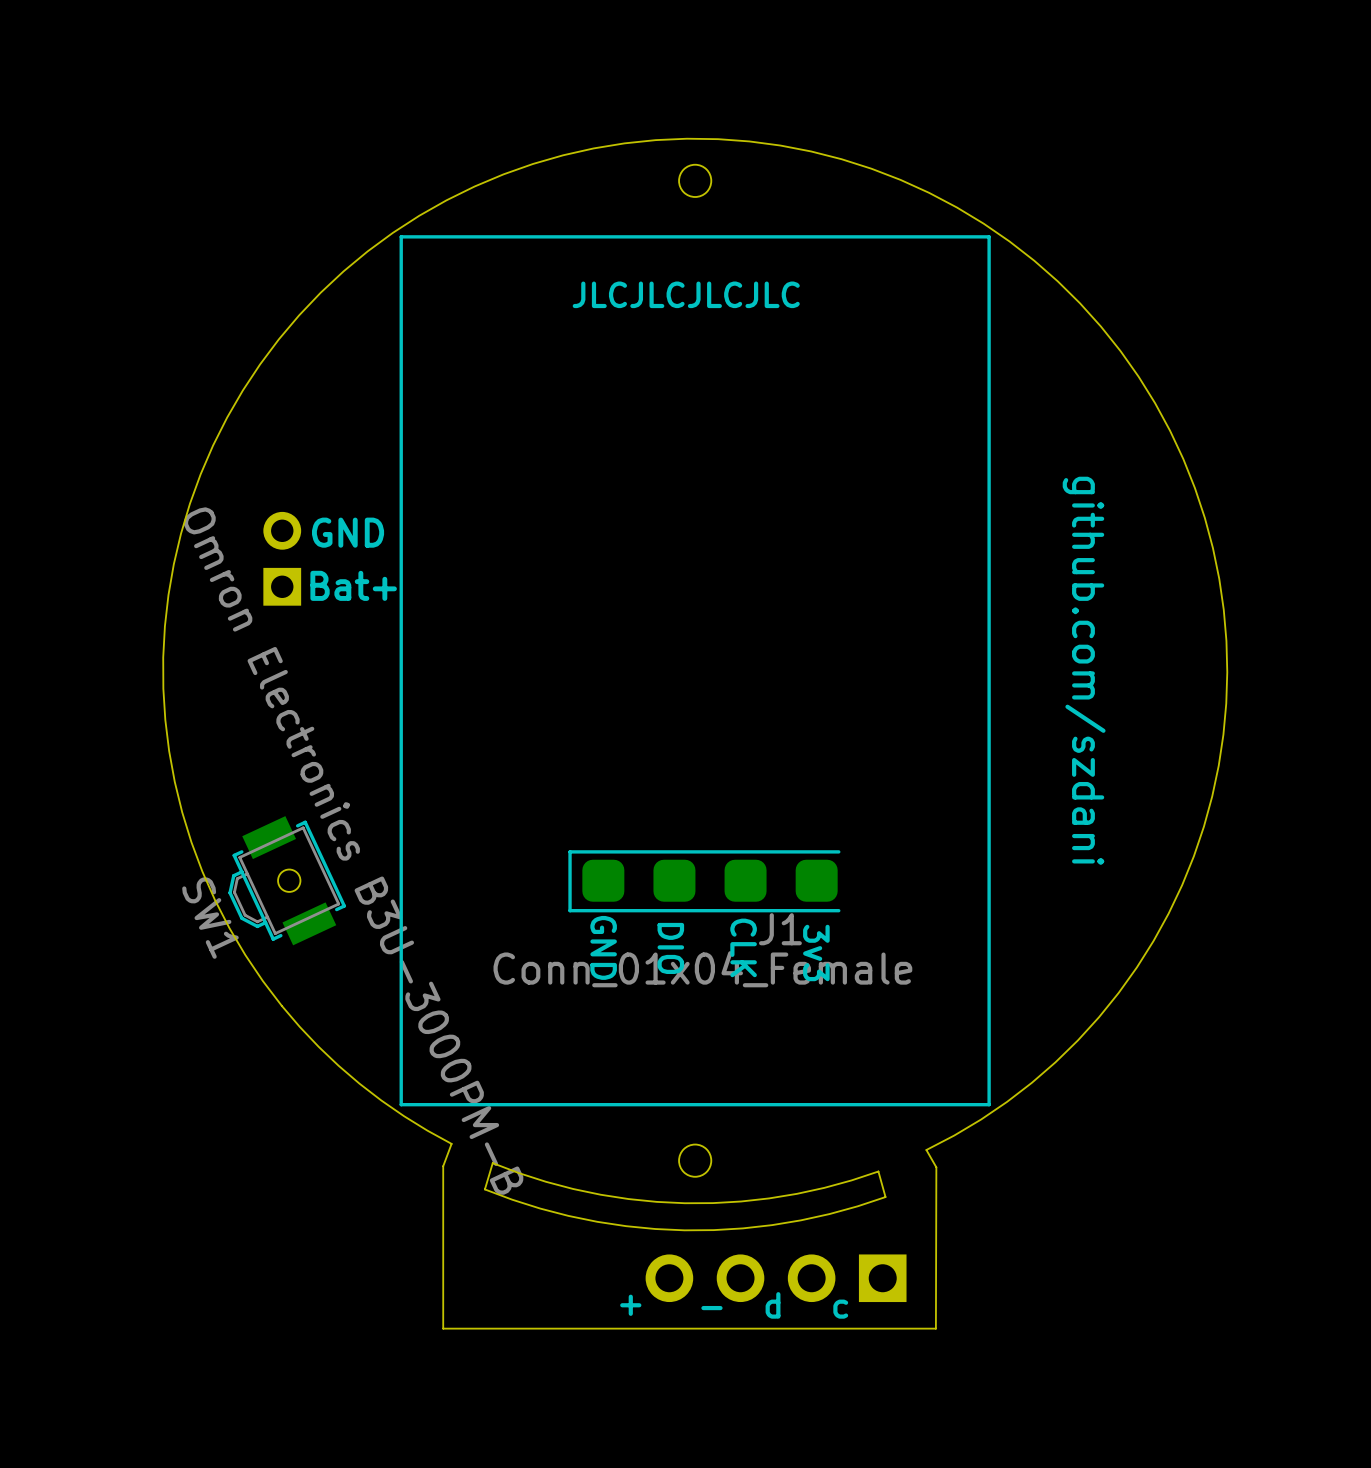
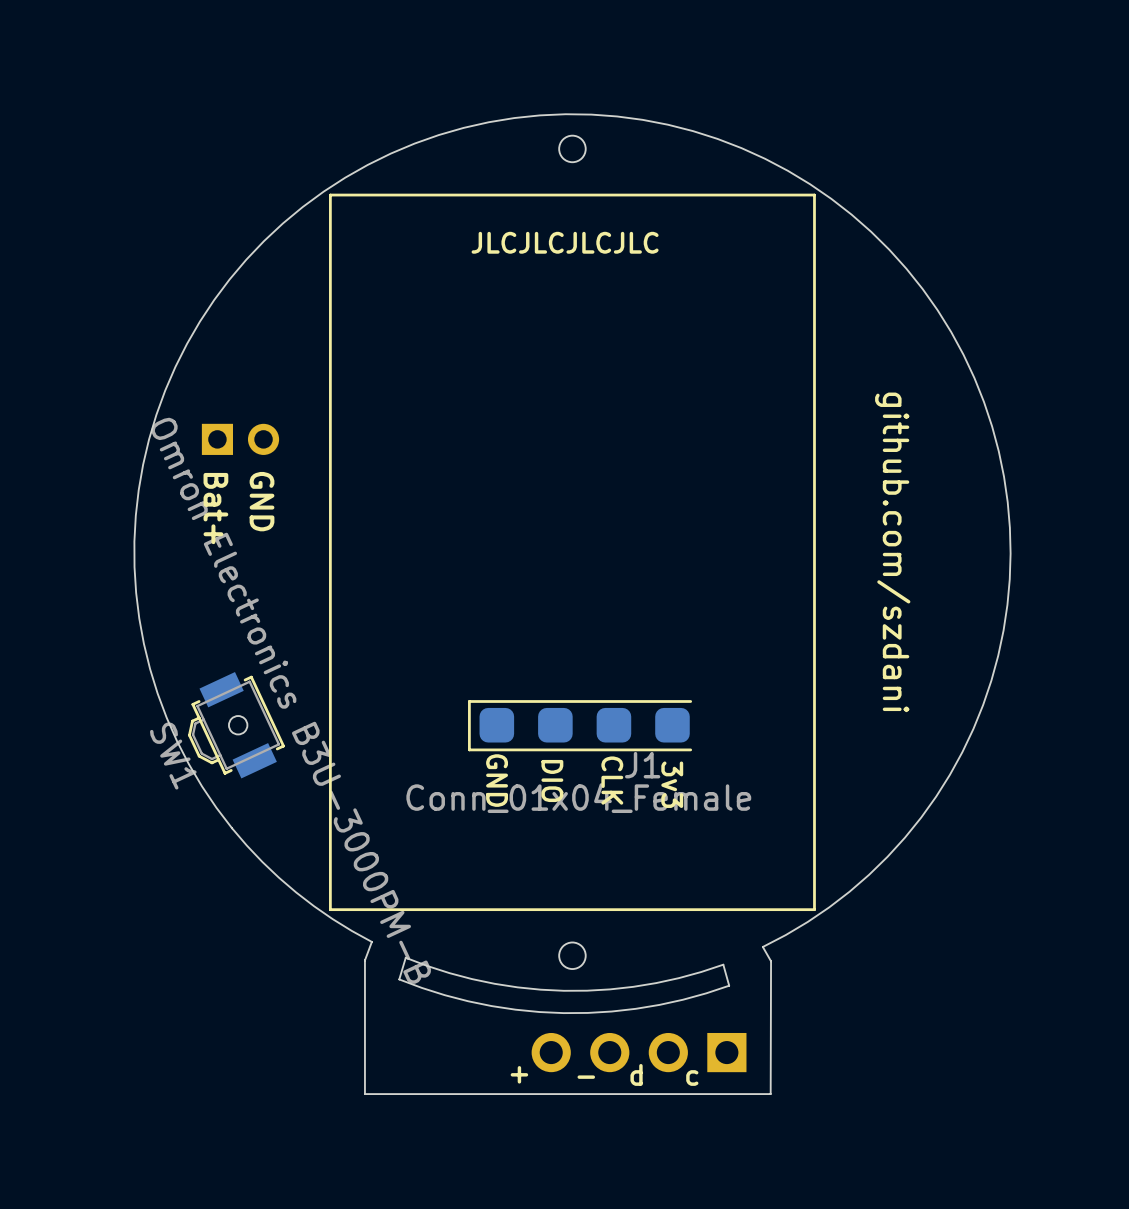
text rotation: 0° (348, 532) -> 90° clockwise (262, 501)
part rotation: 0° (282, 558) -> 90° clockwise (240, 439)
text rotation: 0° (353, 585) -> 90° clockwise (215, 508)

